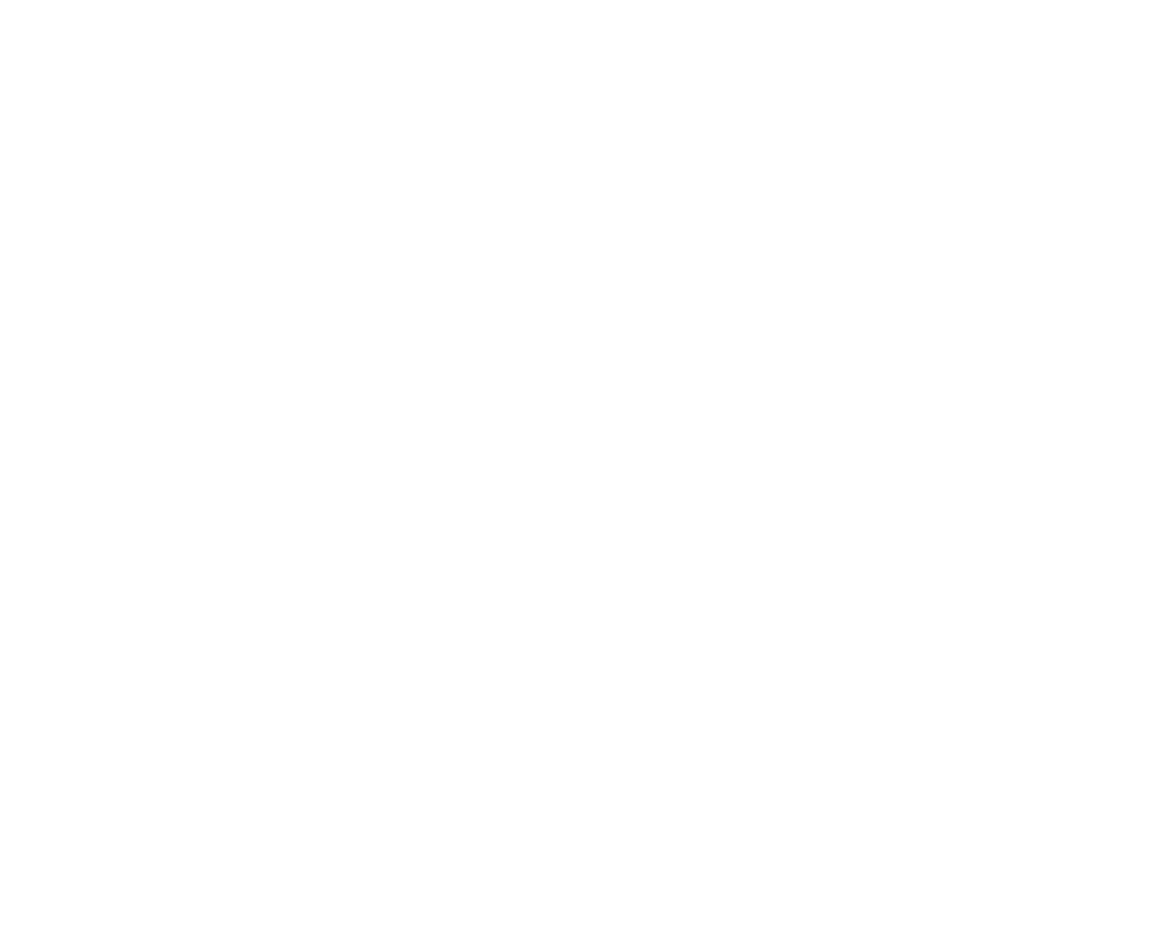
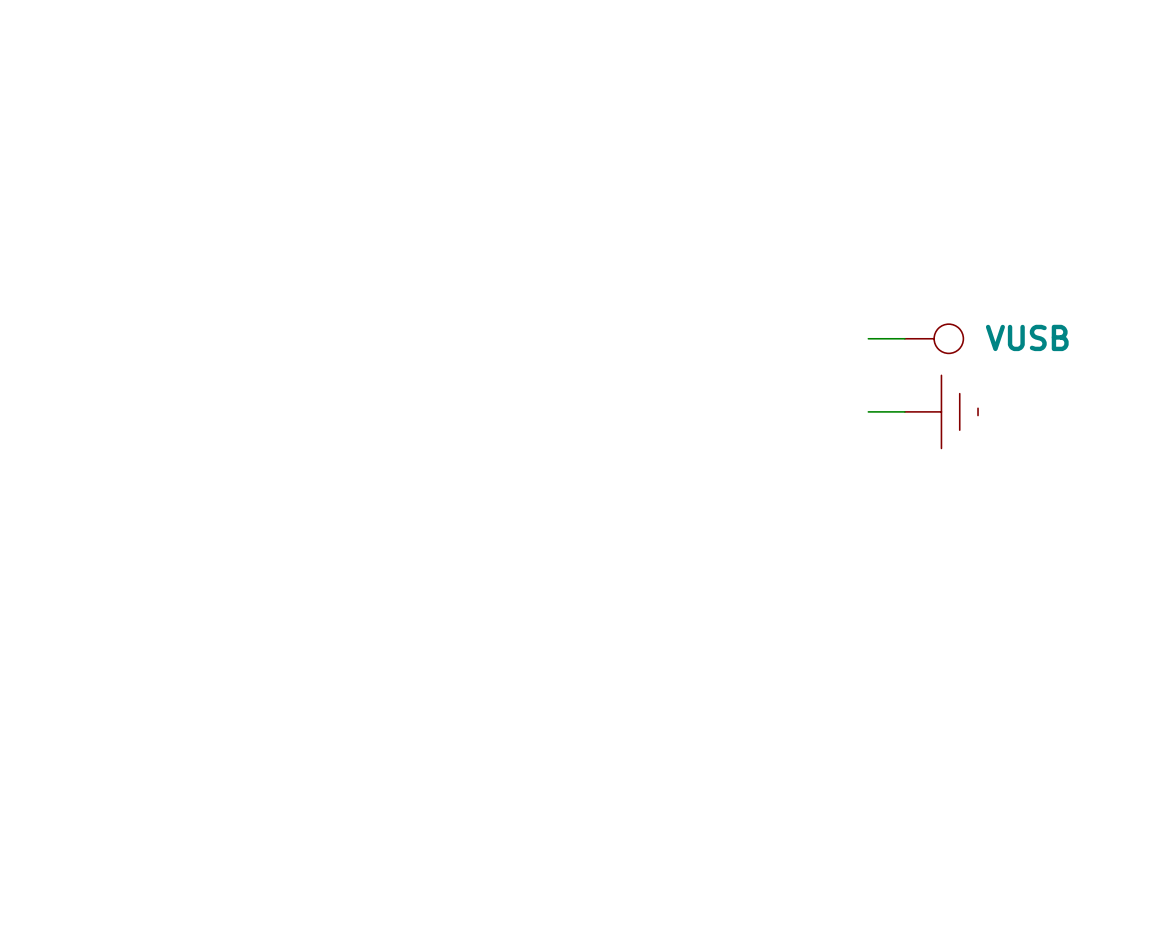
wire: none -> (868, 338) (904, 338)
power symbol: none -> VUSB (934, 338)
wire: none -> (868, 411) (904, 411)
power symbol: none -> (941, 411)

